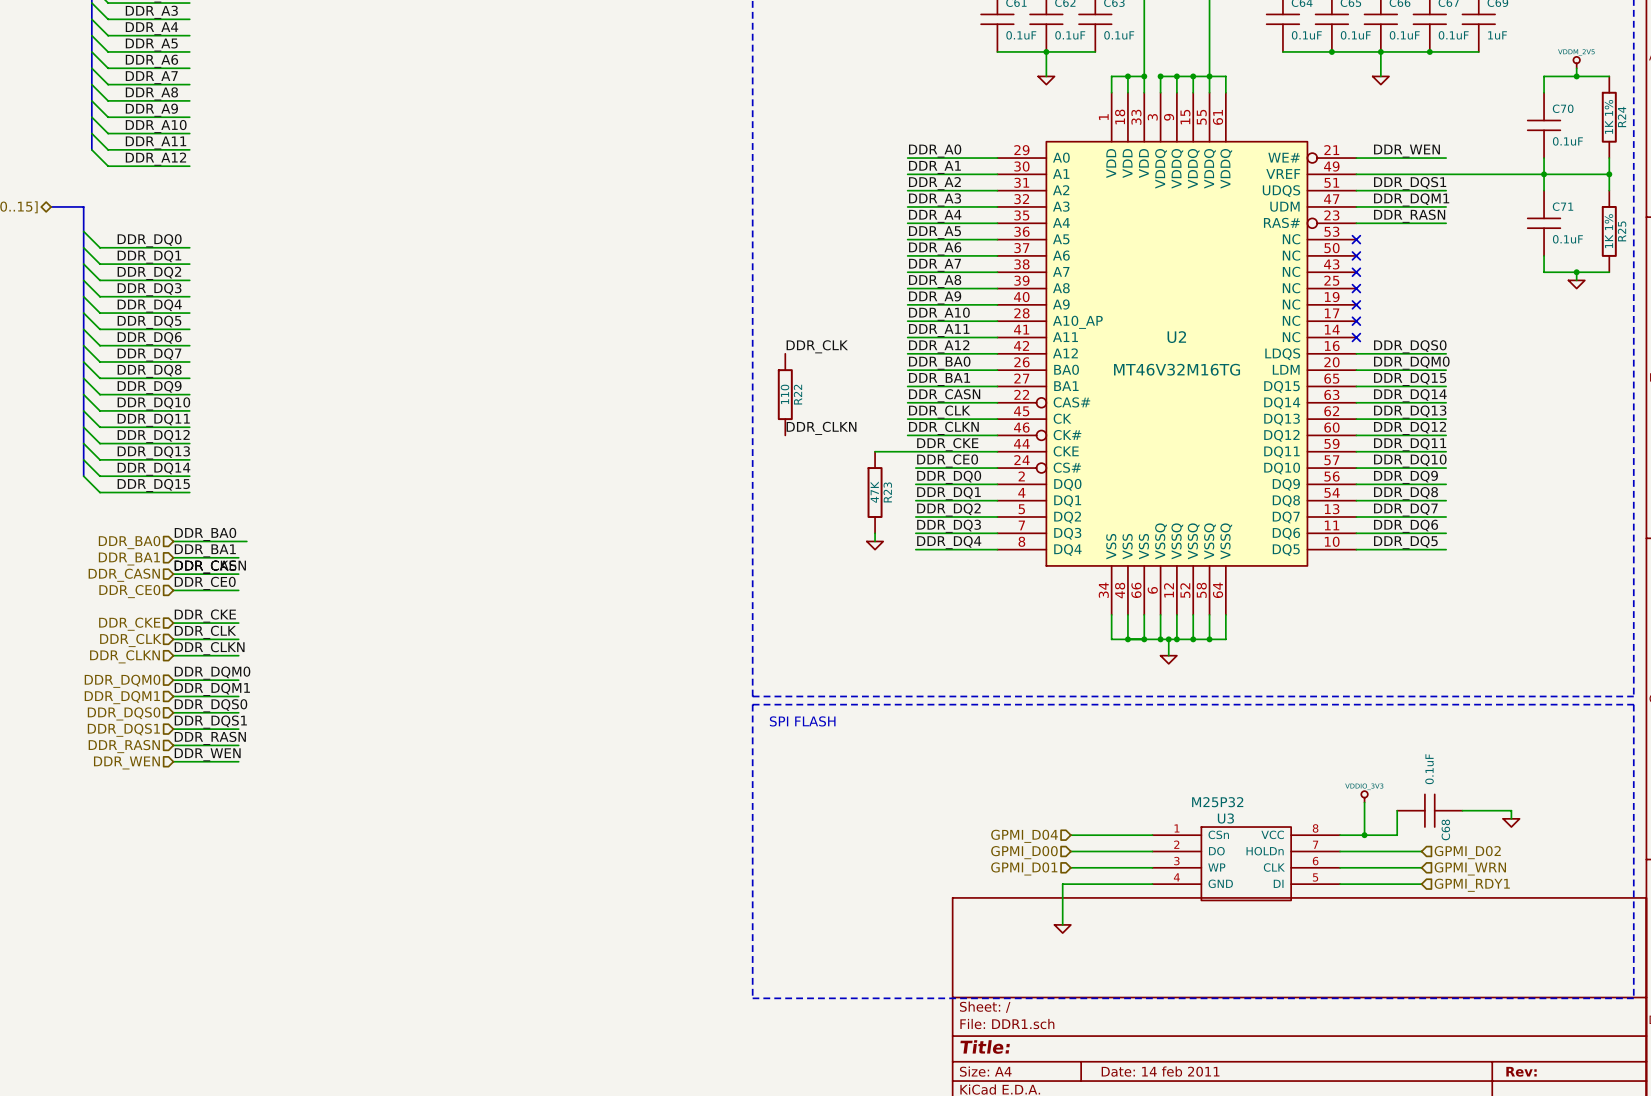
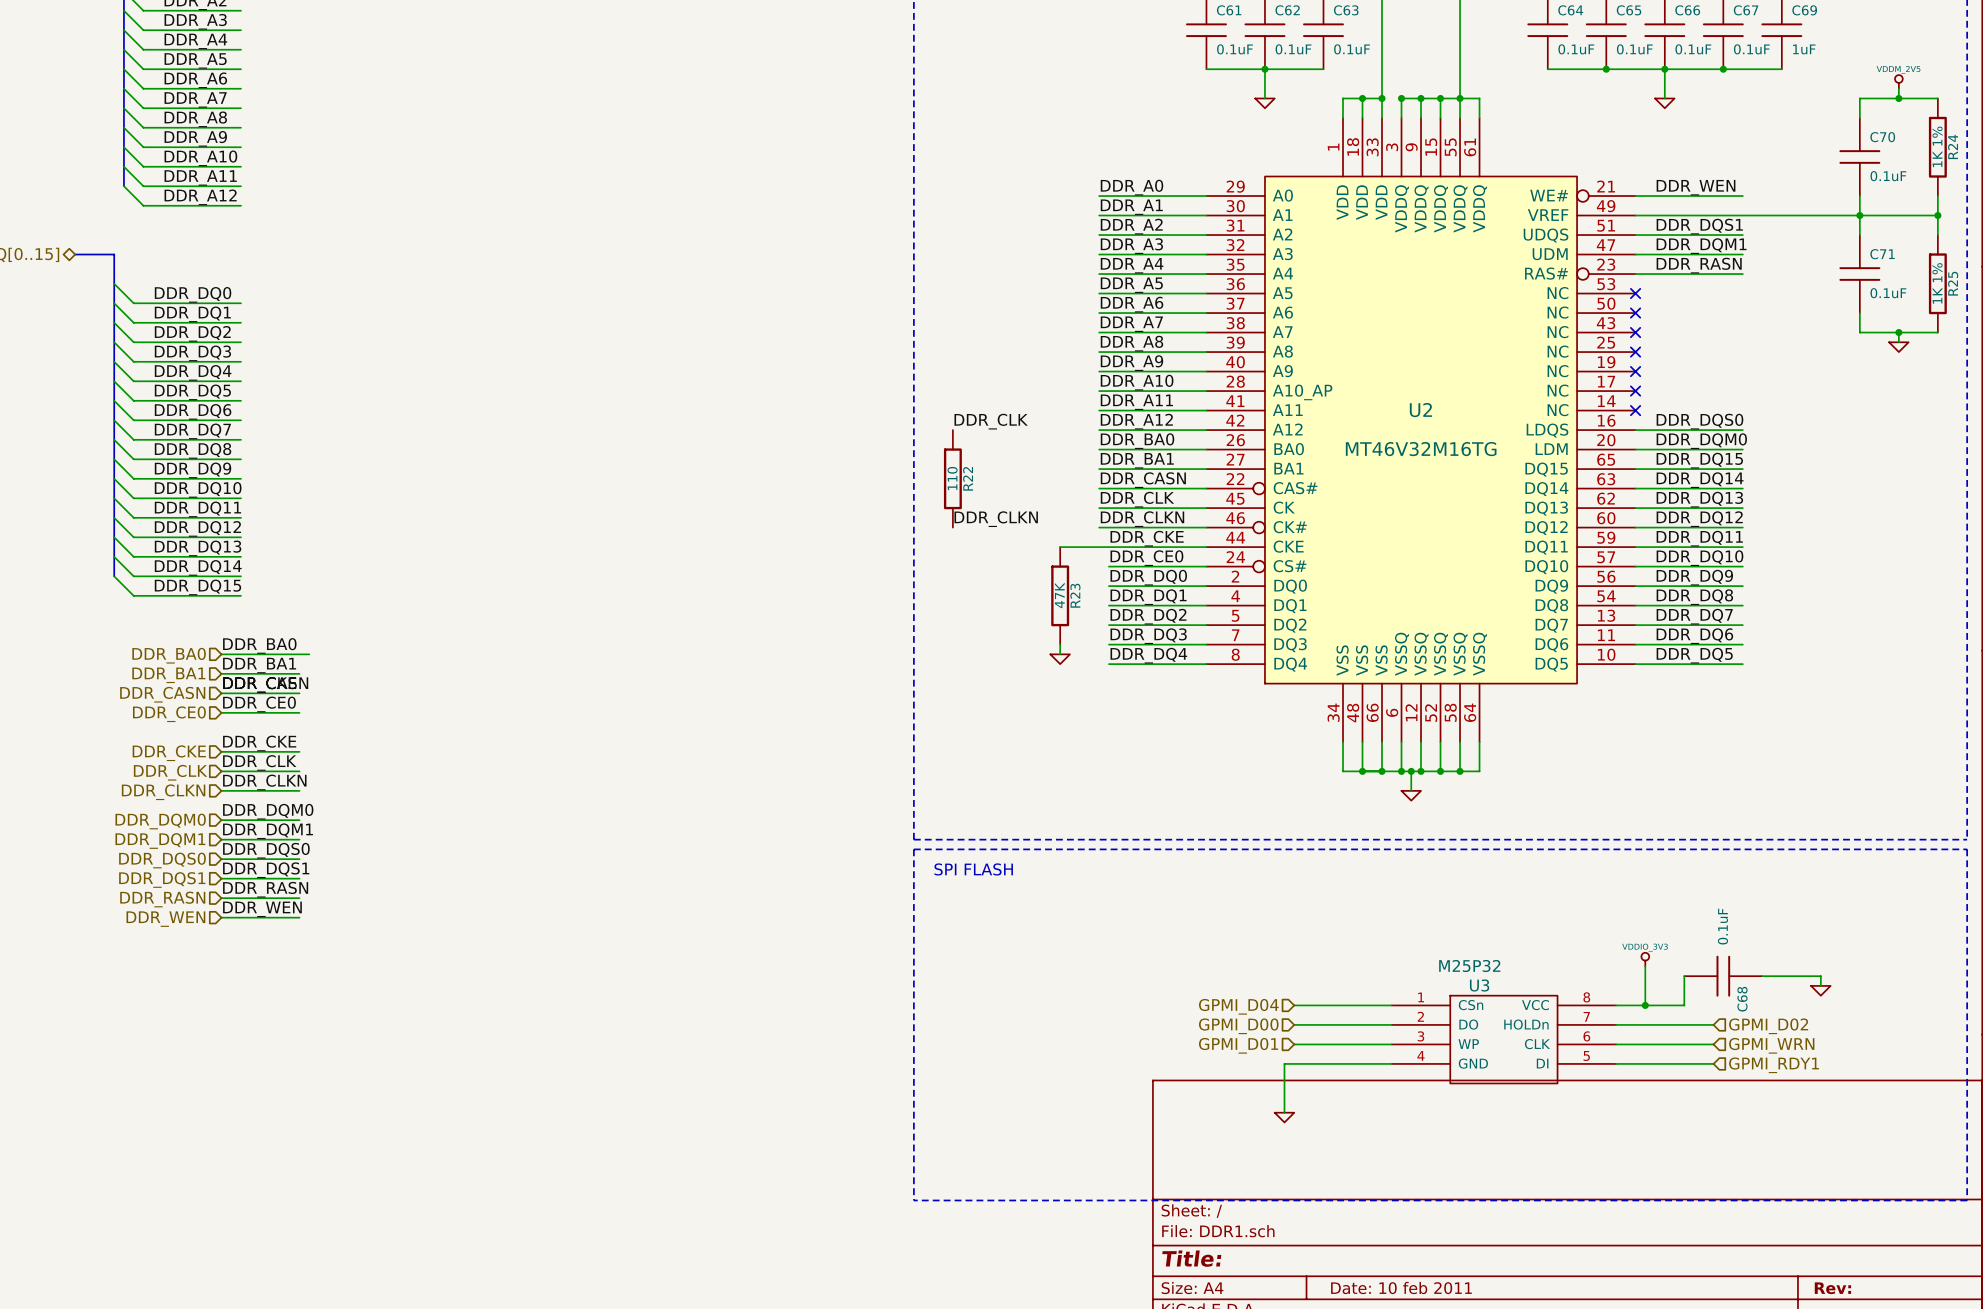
title block: Date: 14 feb 2011 (1160, 1071) -> Date: 10 feb 2011 (1401, 1288)

